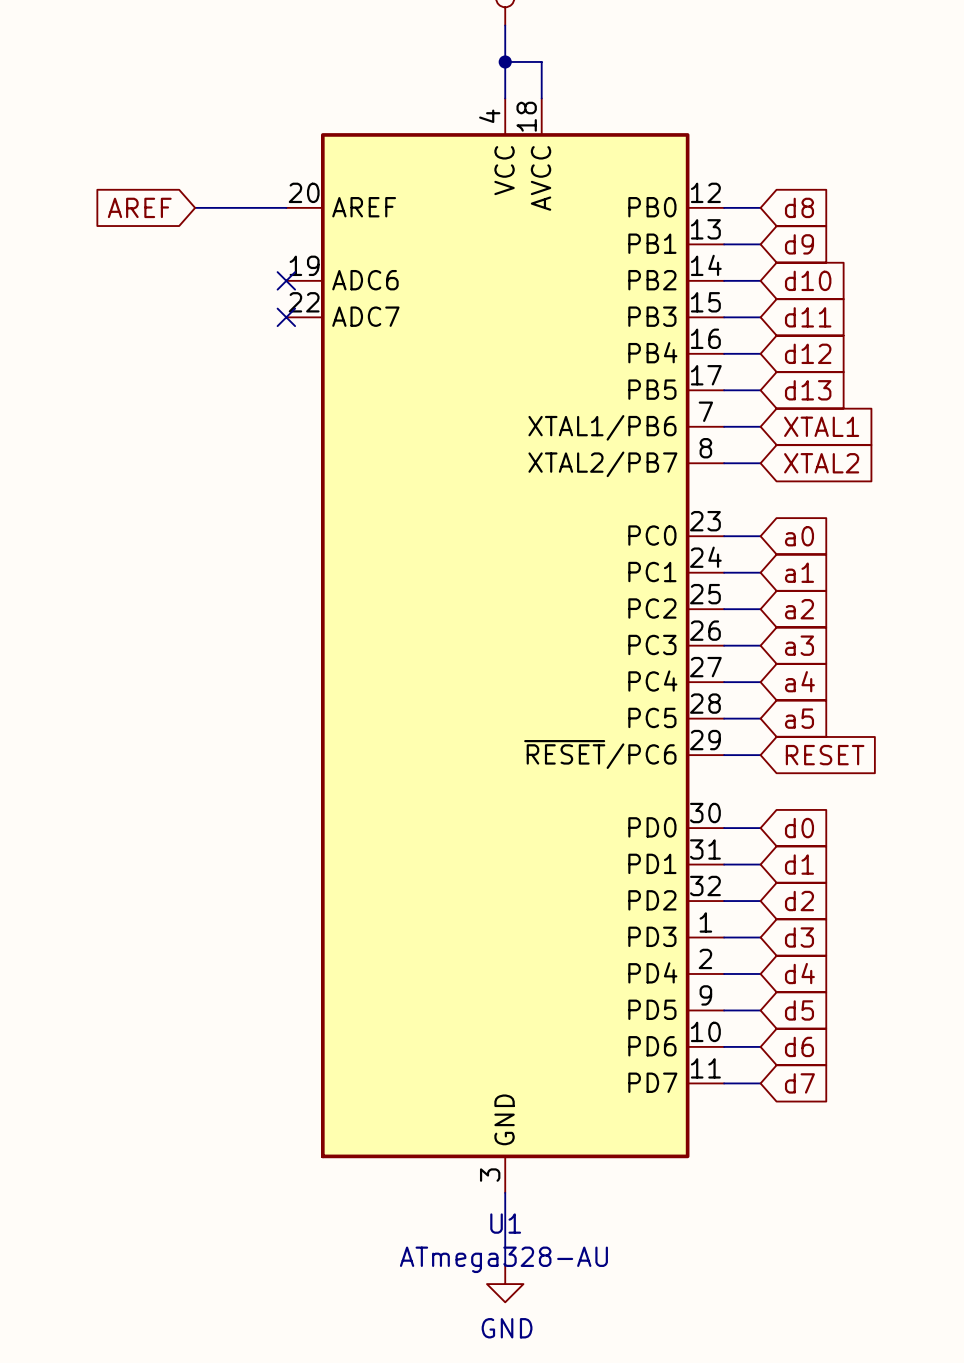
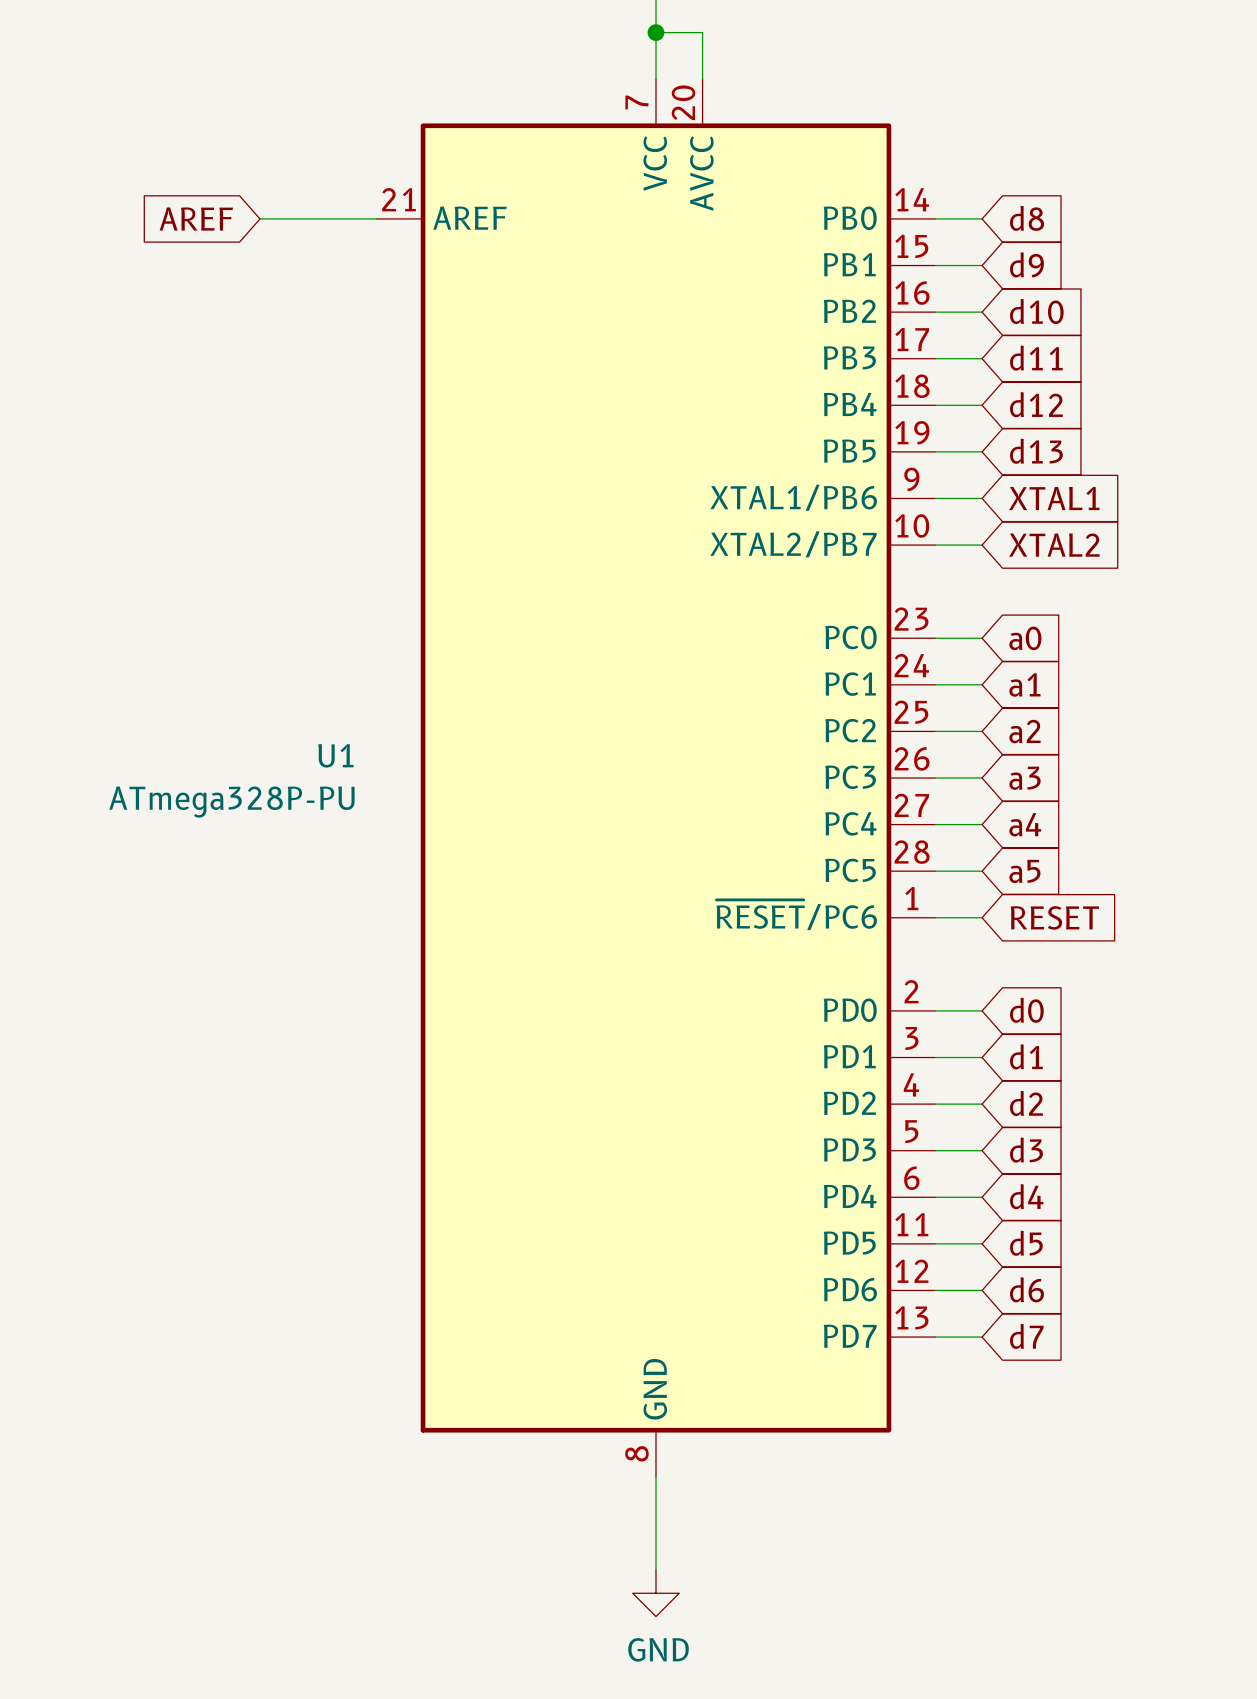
U1 symbol: [286, 98, 725, 1193] -> [376, 79, 936, 1477]
no-connect mark: (286, 280) -> none
no-connect mark: (286, 317) -> none
U1 name position: U1 (505, 1223) -> U1 (335, 755)
U1 value: ATmega328-AU (503, 1259) -> ATmega328P-PU (231, 802)

